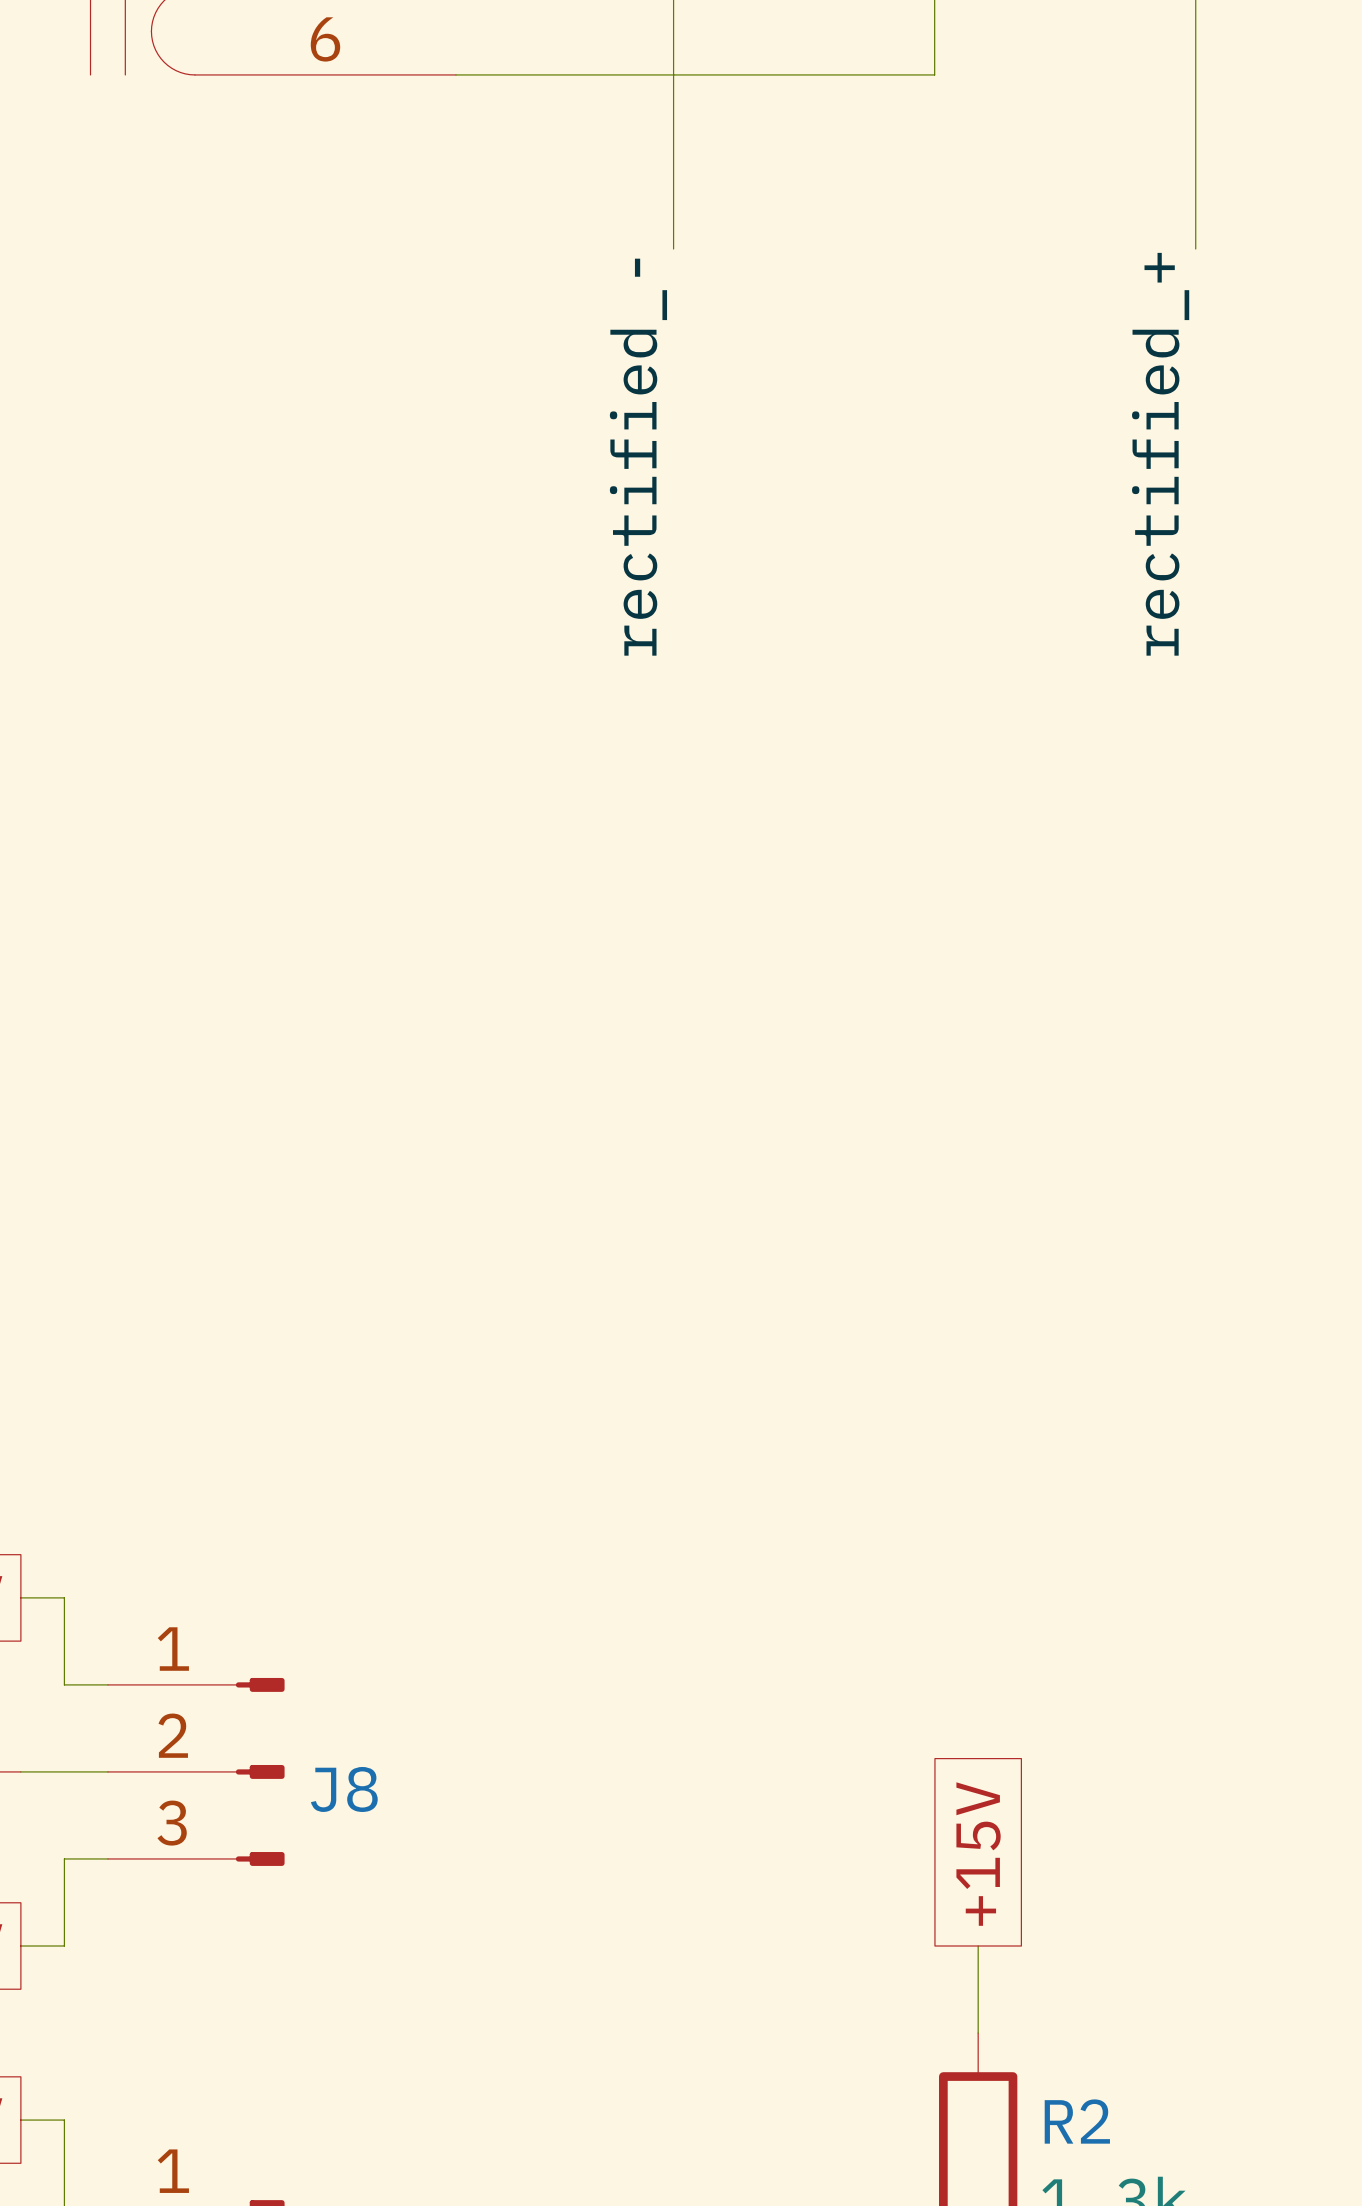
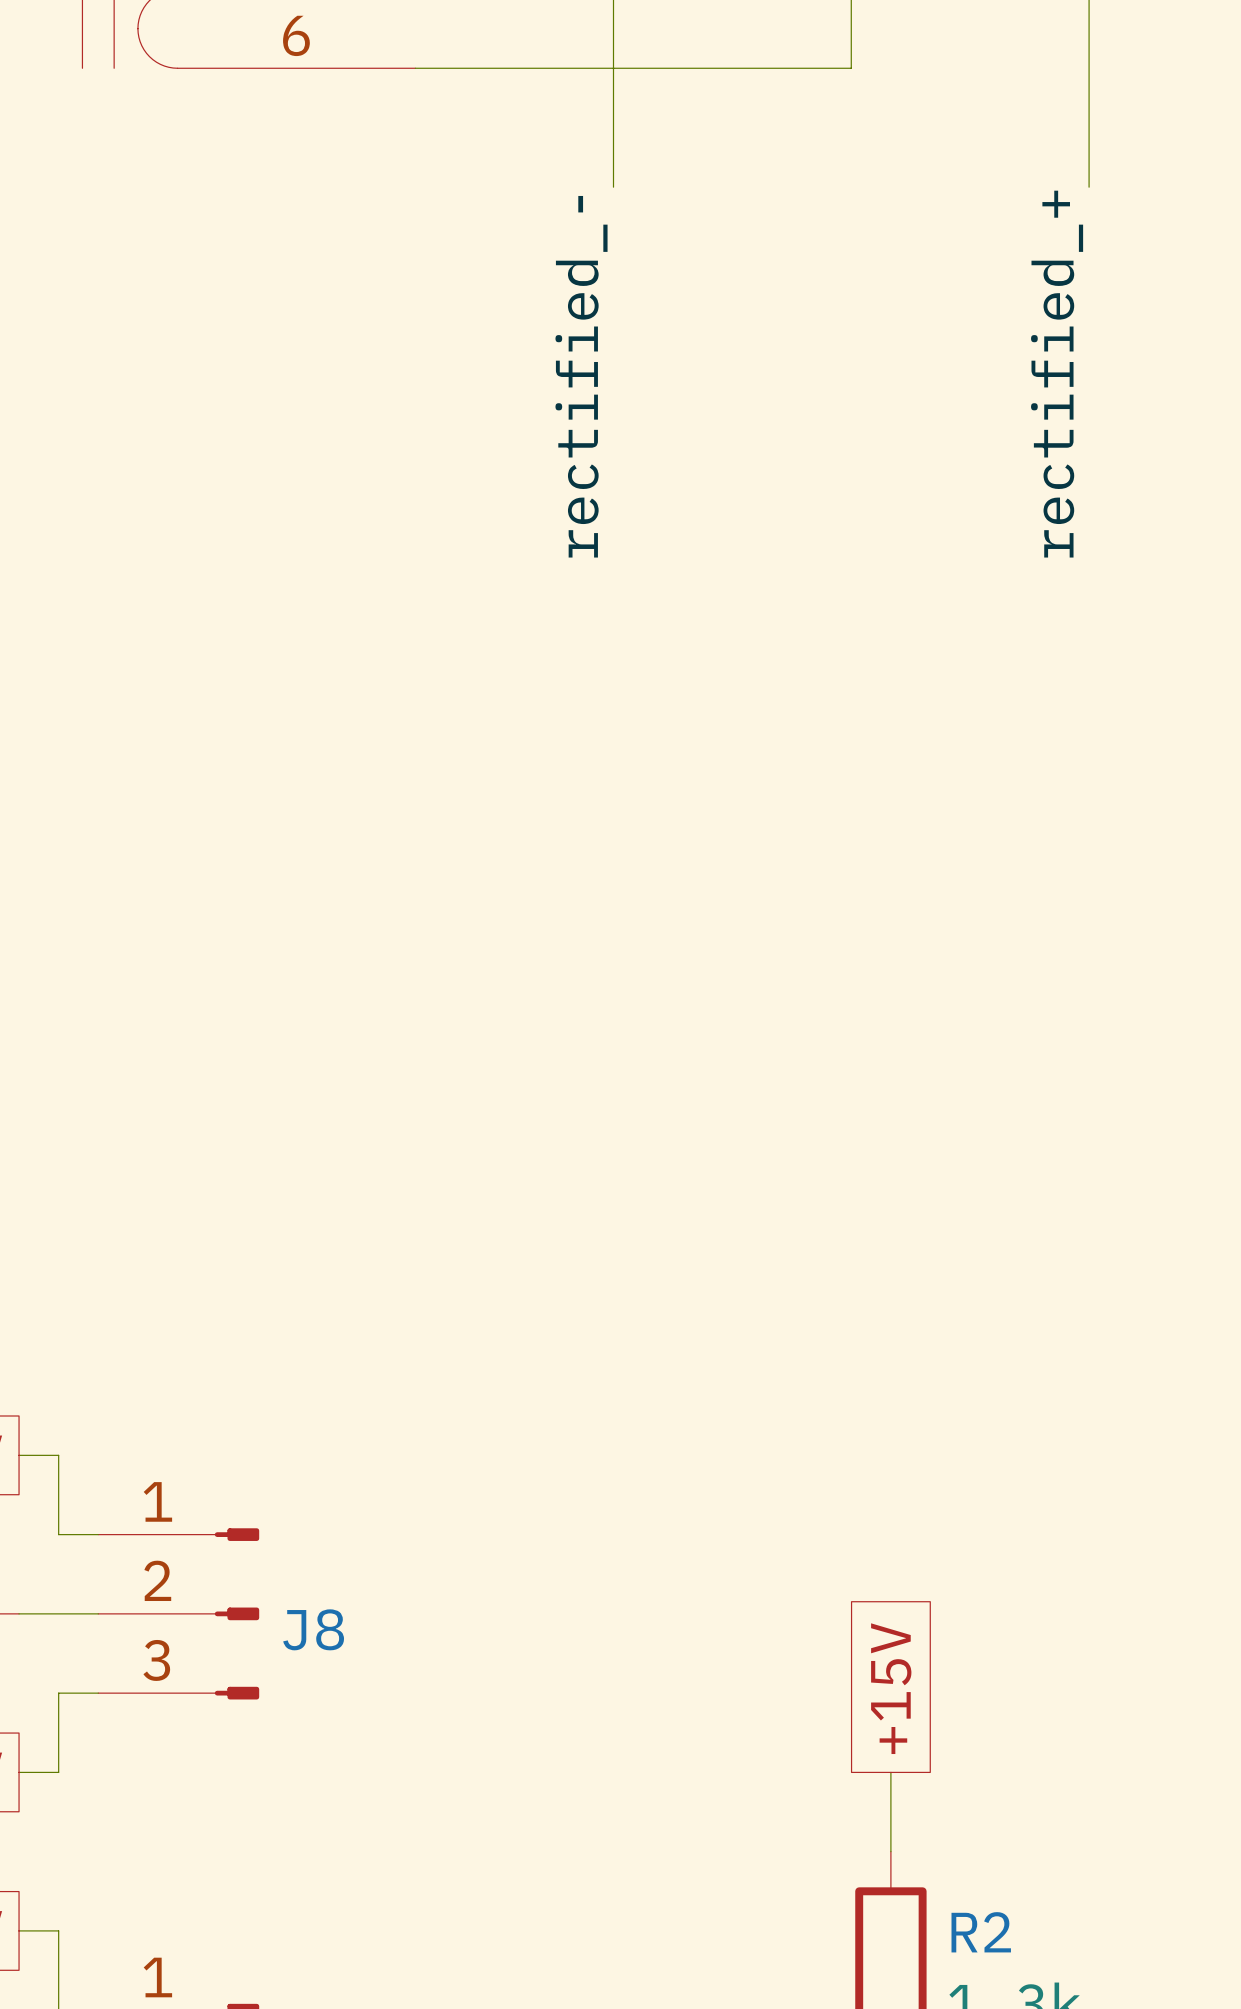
wire: (673, 205) (673, 249) -> none
wire: (1195, 205) (1195, 249) -> none
label position: rectified_+ (1160, 454) -> rectified_+ (1057, 374)
label position: rectified_- (638, 457) -> rectified_- (581, 376)

